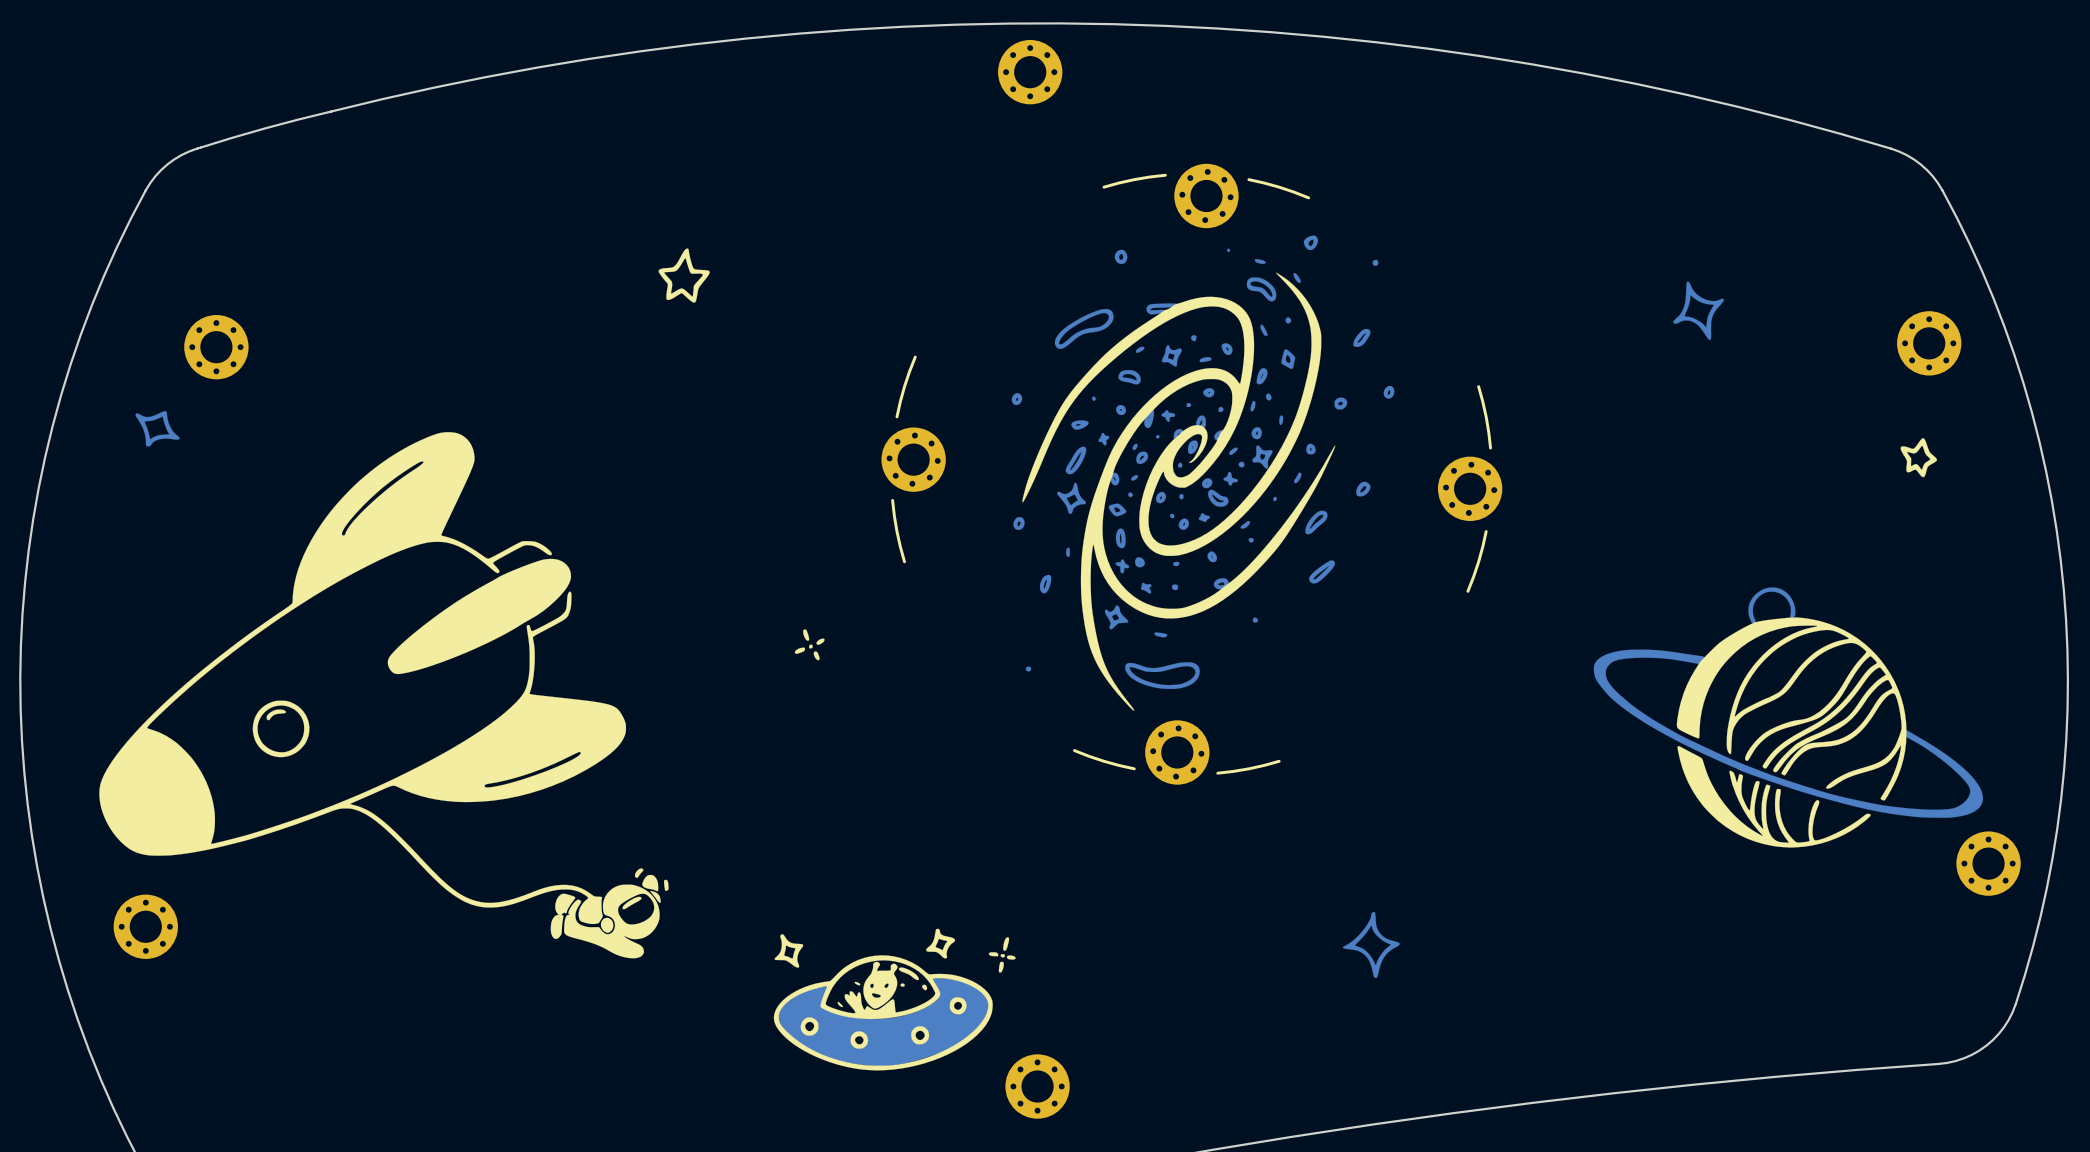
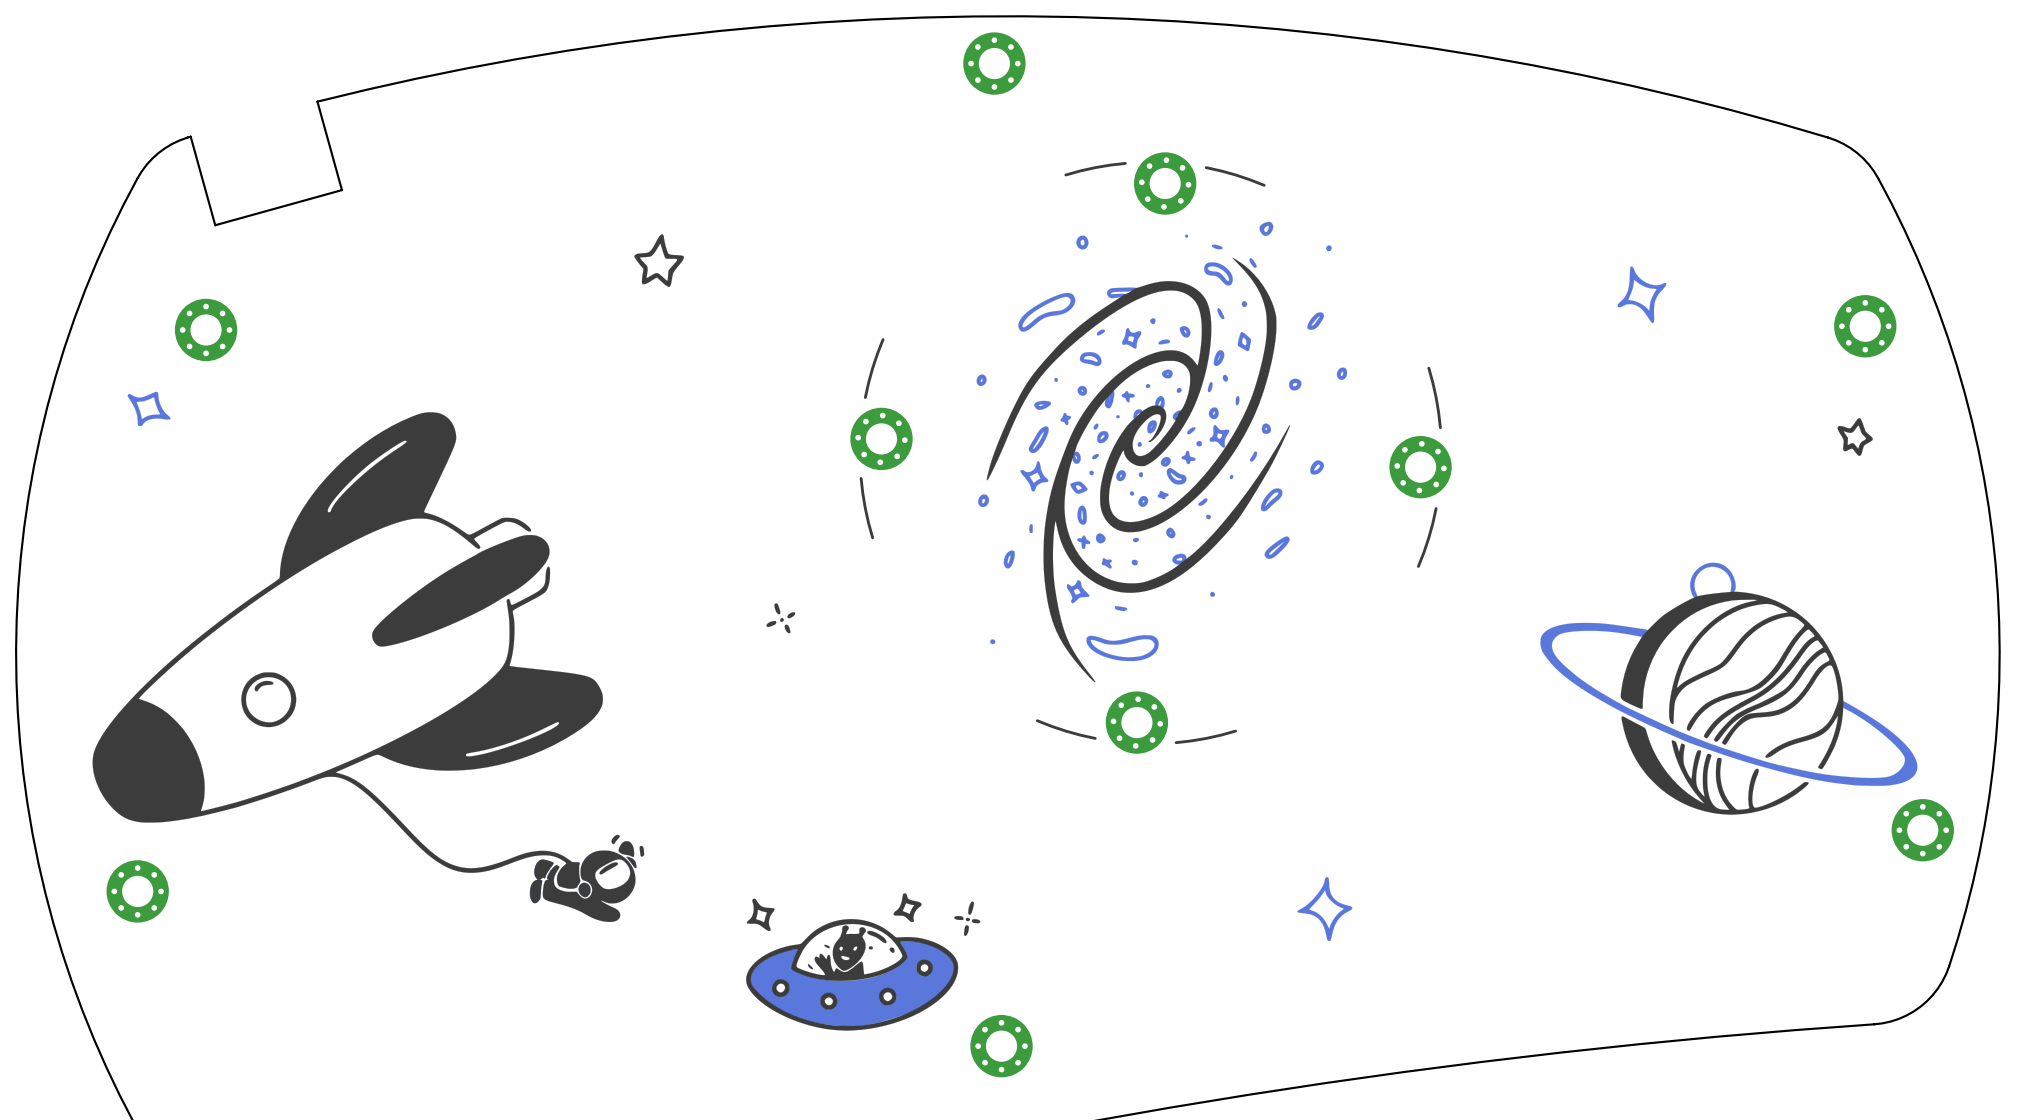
board edge: (331, 111) (200, 147) -> (317, 101) (341, 190) (215, 225) (190, 136)

